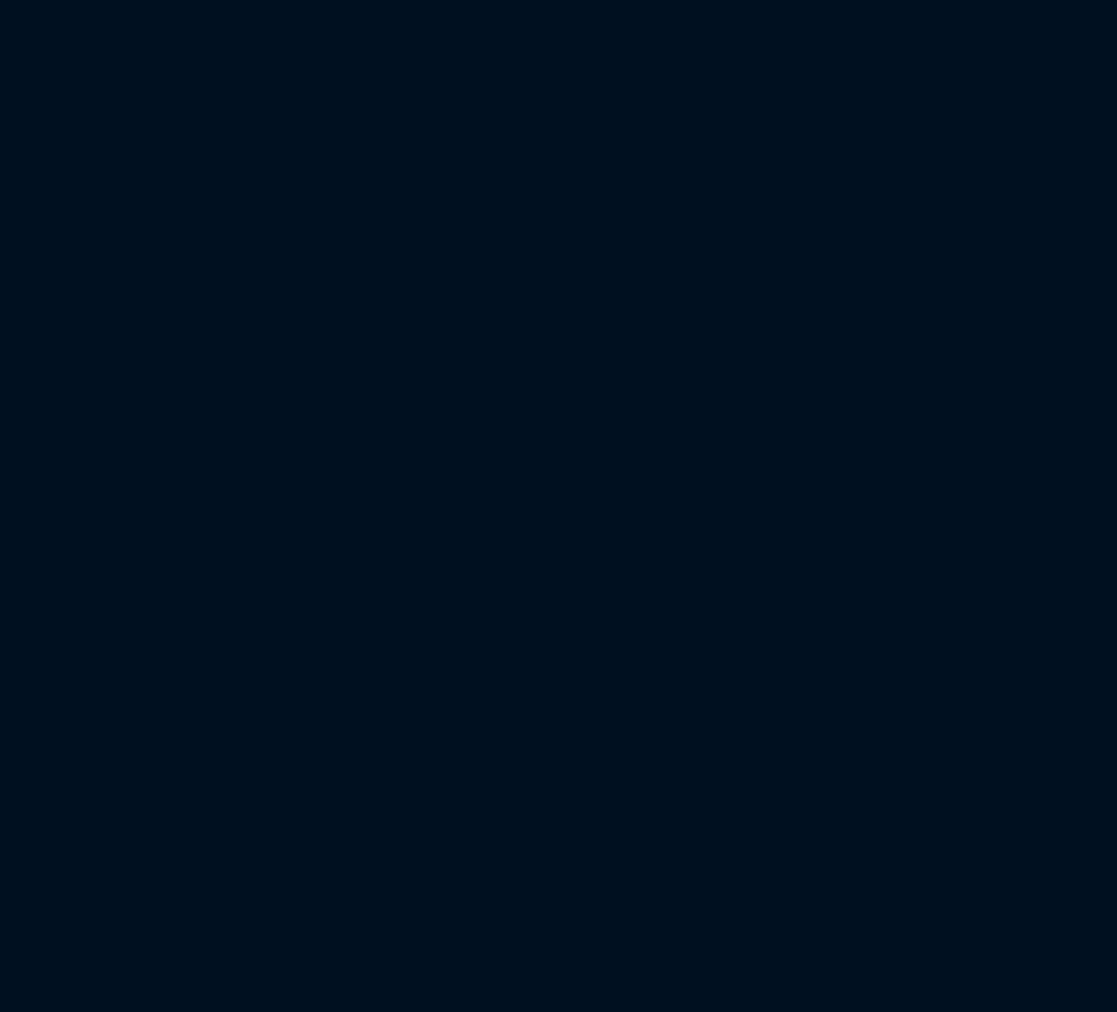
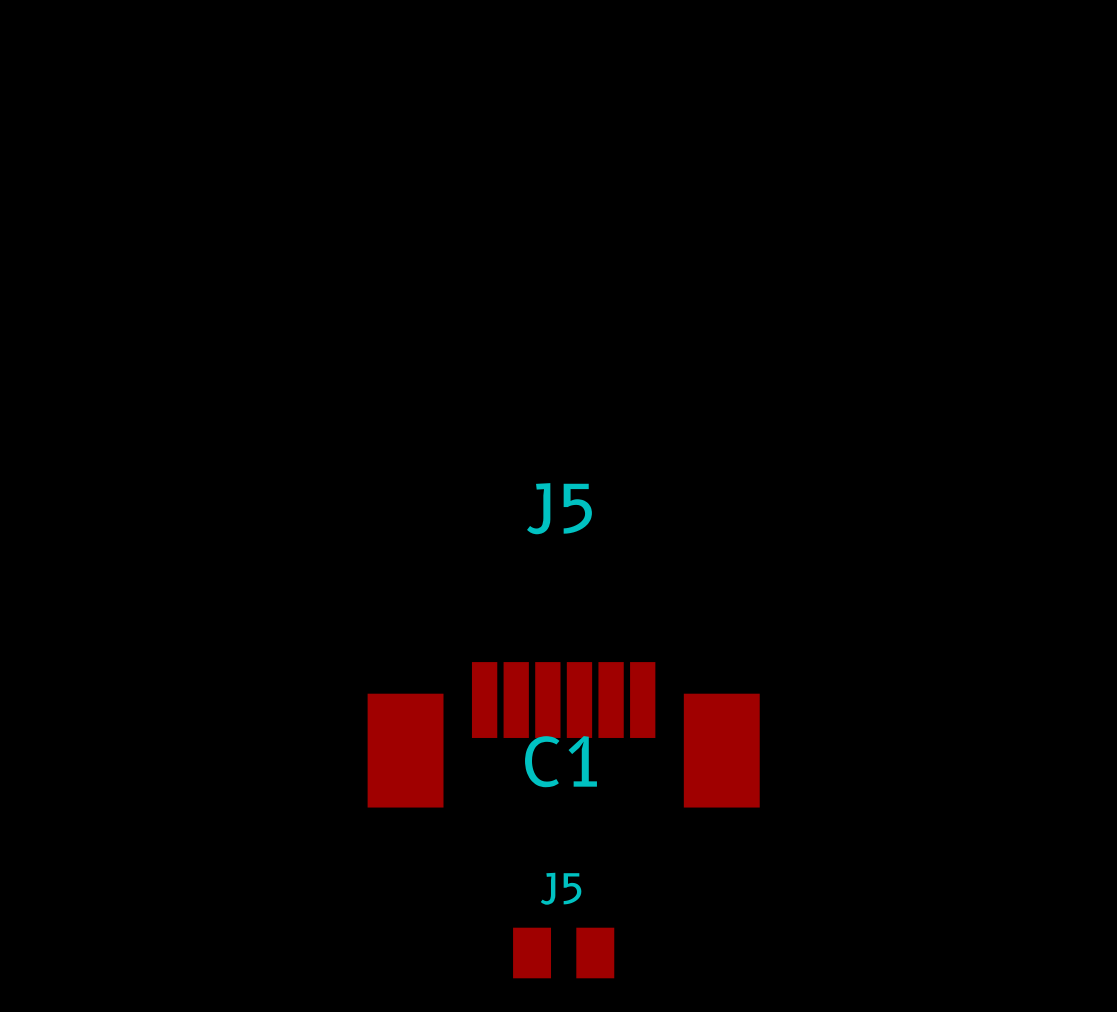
J5: none -> (563, 734)
text: none -> J5 (561, 888)
C1: none -> (563, 953)

